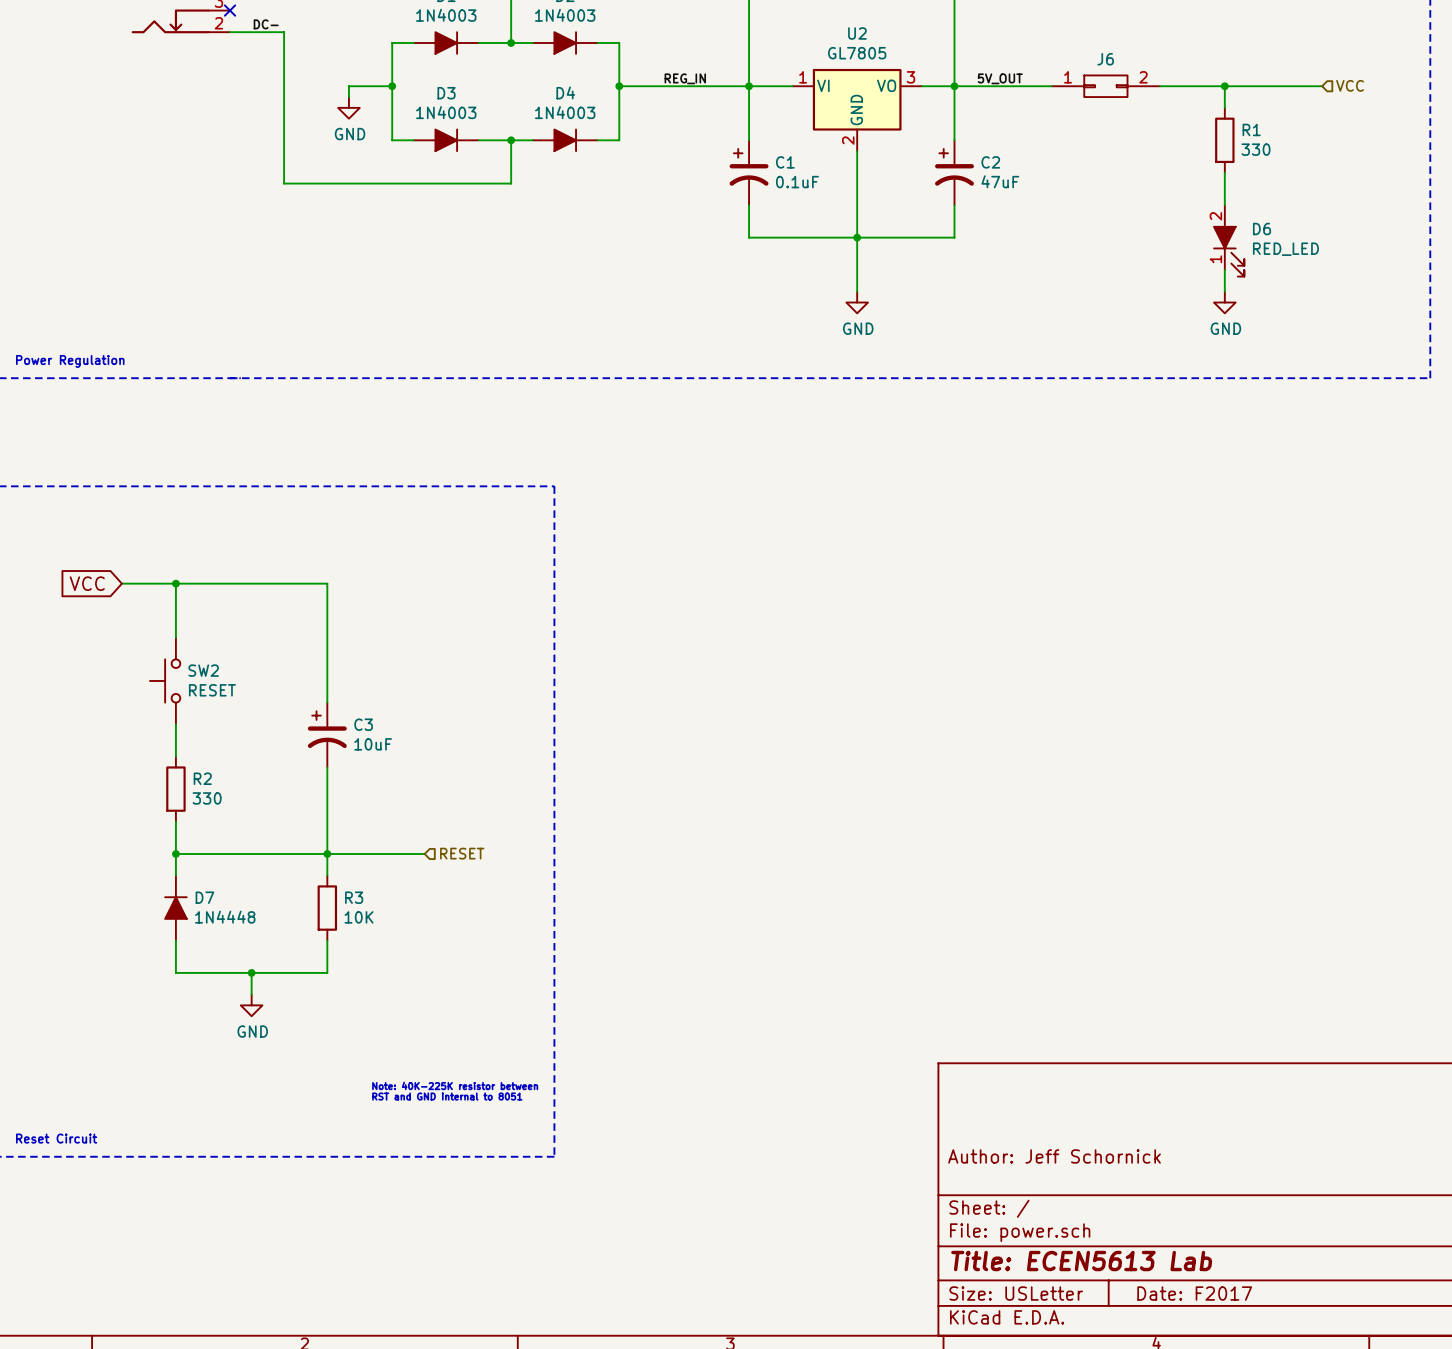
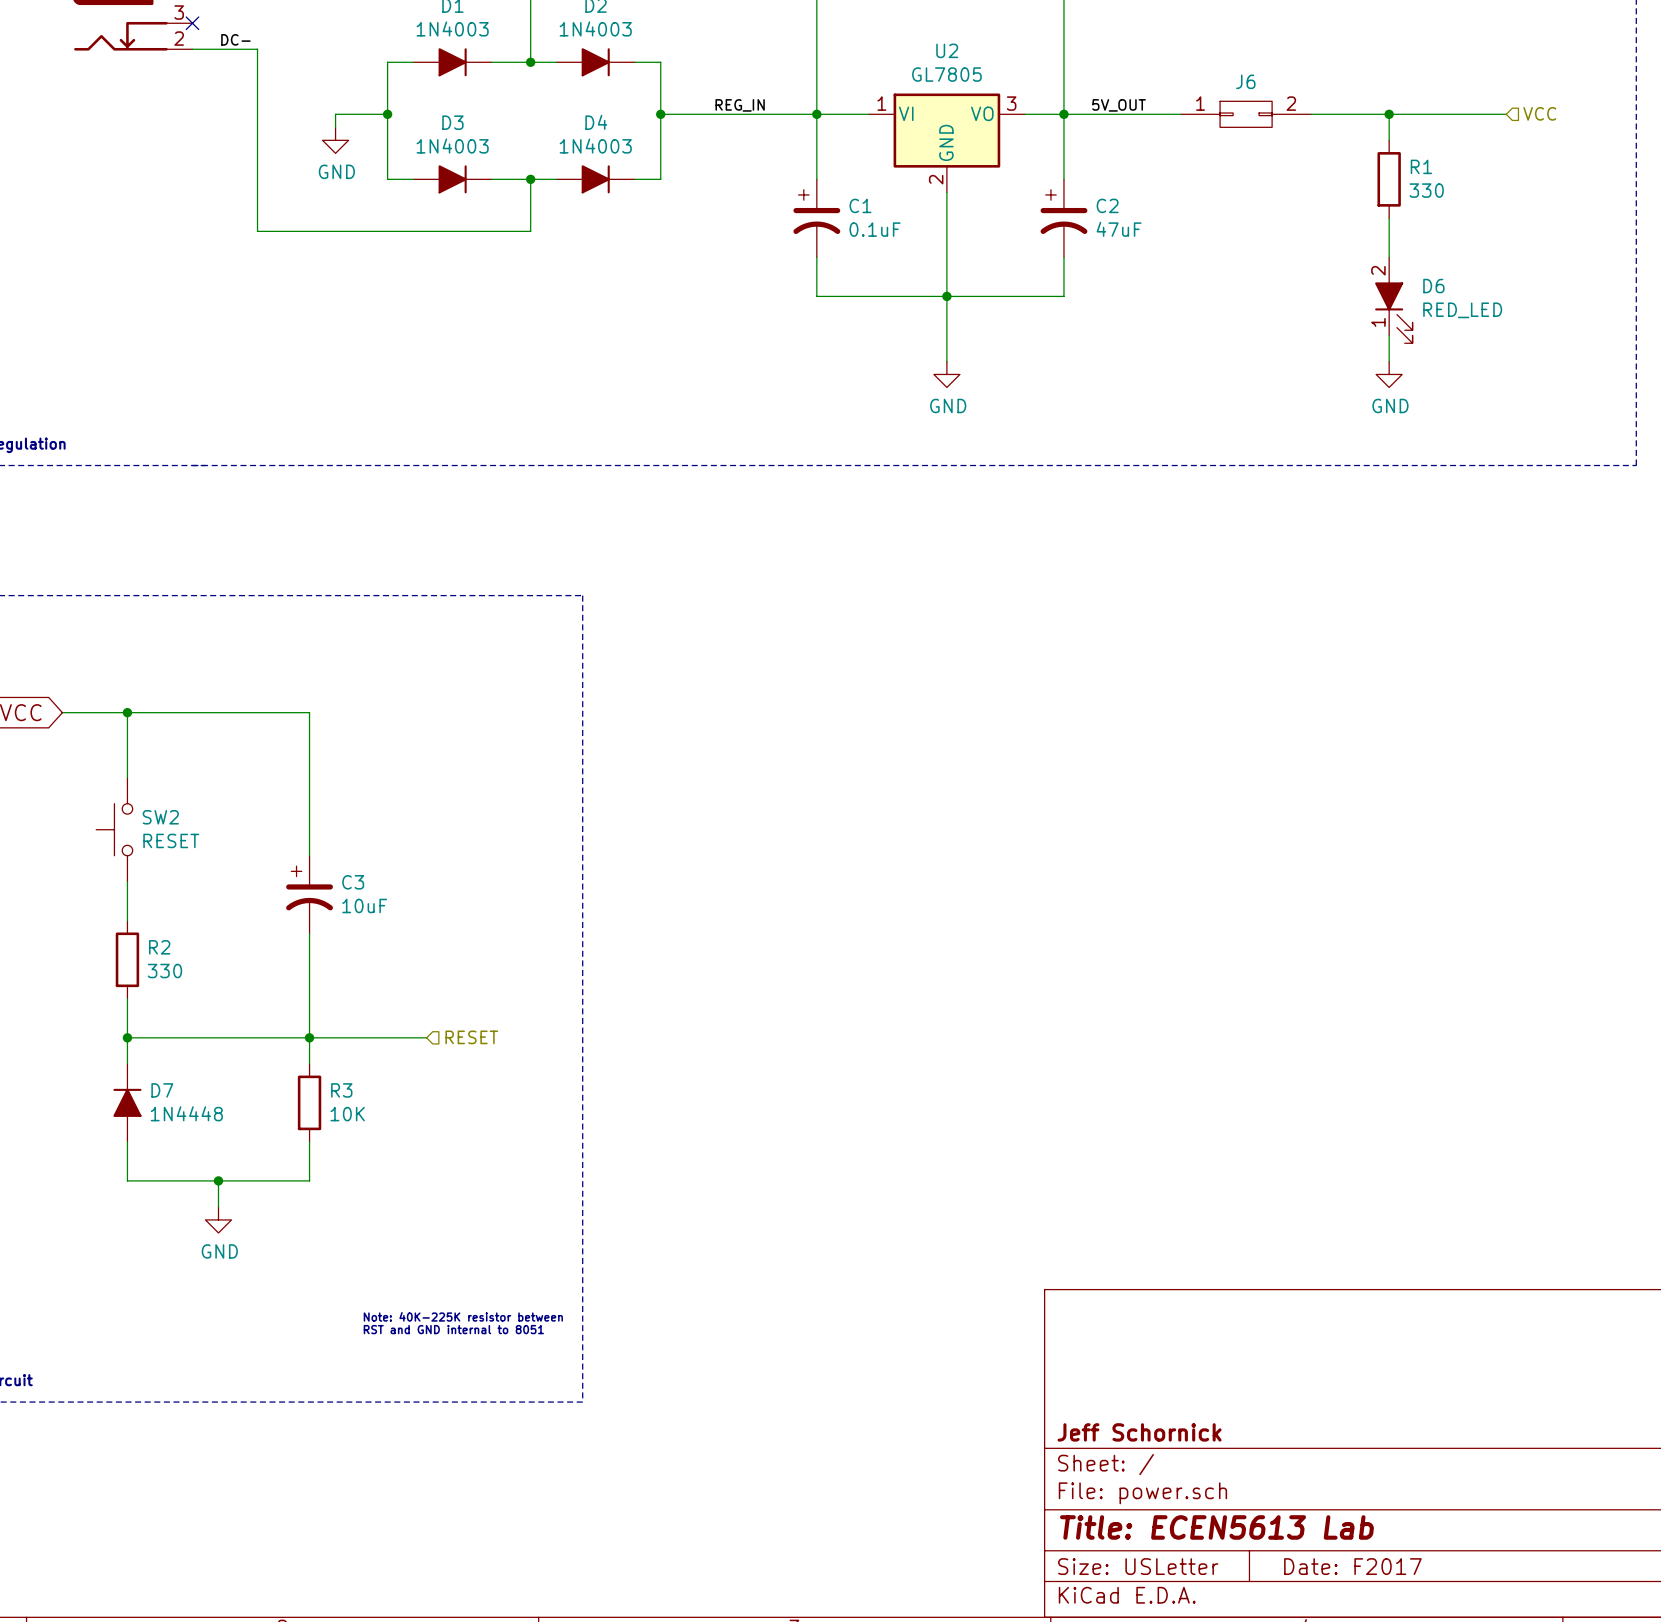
title block: Author: Jeff Schornick (1054, 1156) -> Jeff Schornick (1139, 1432)

